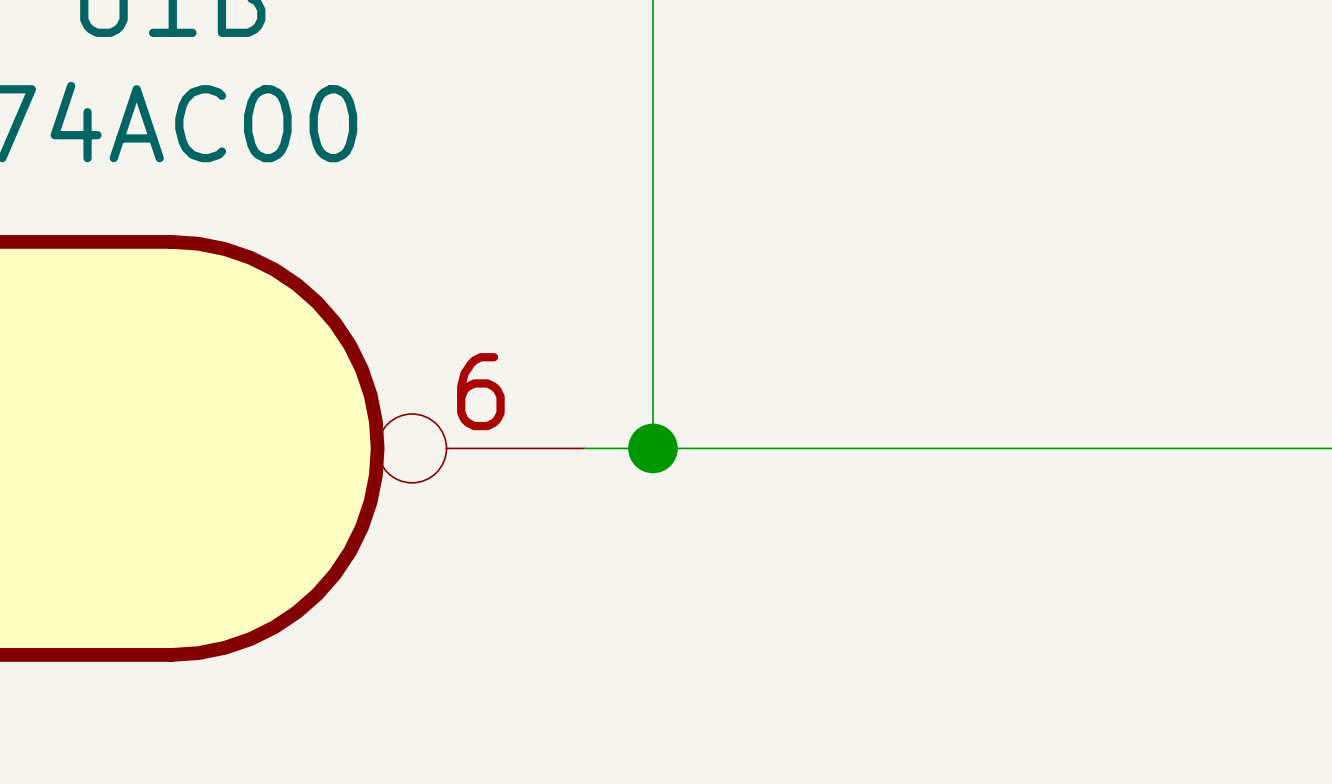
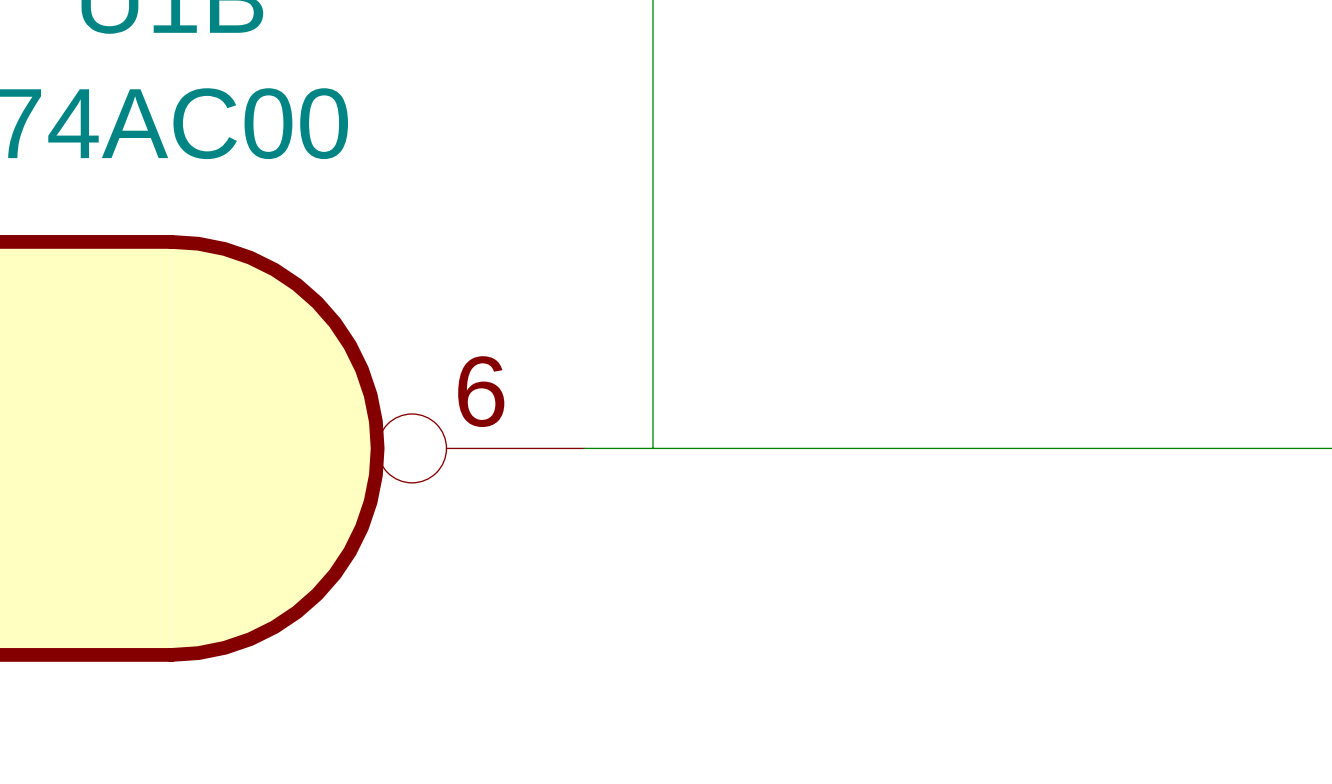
junction: (652, 448) -> none

